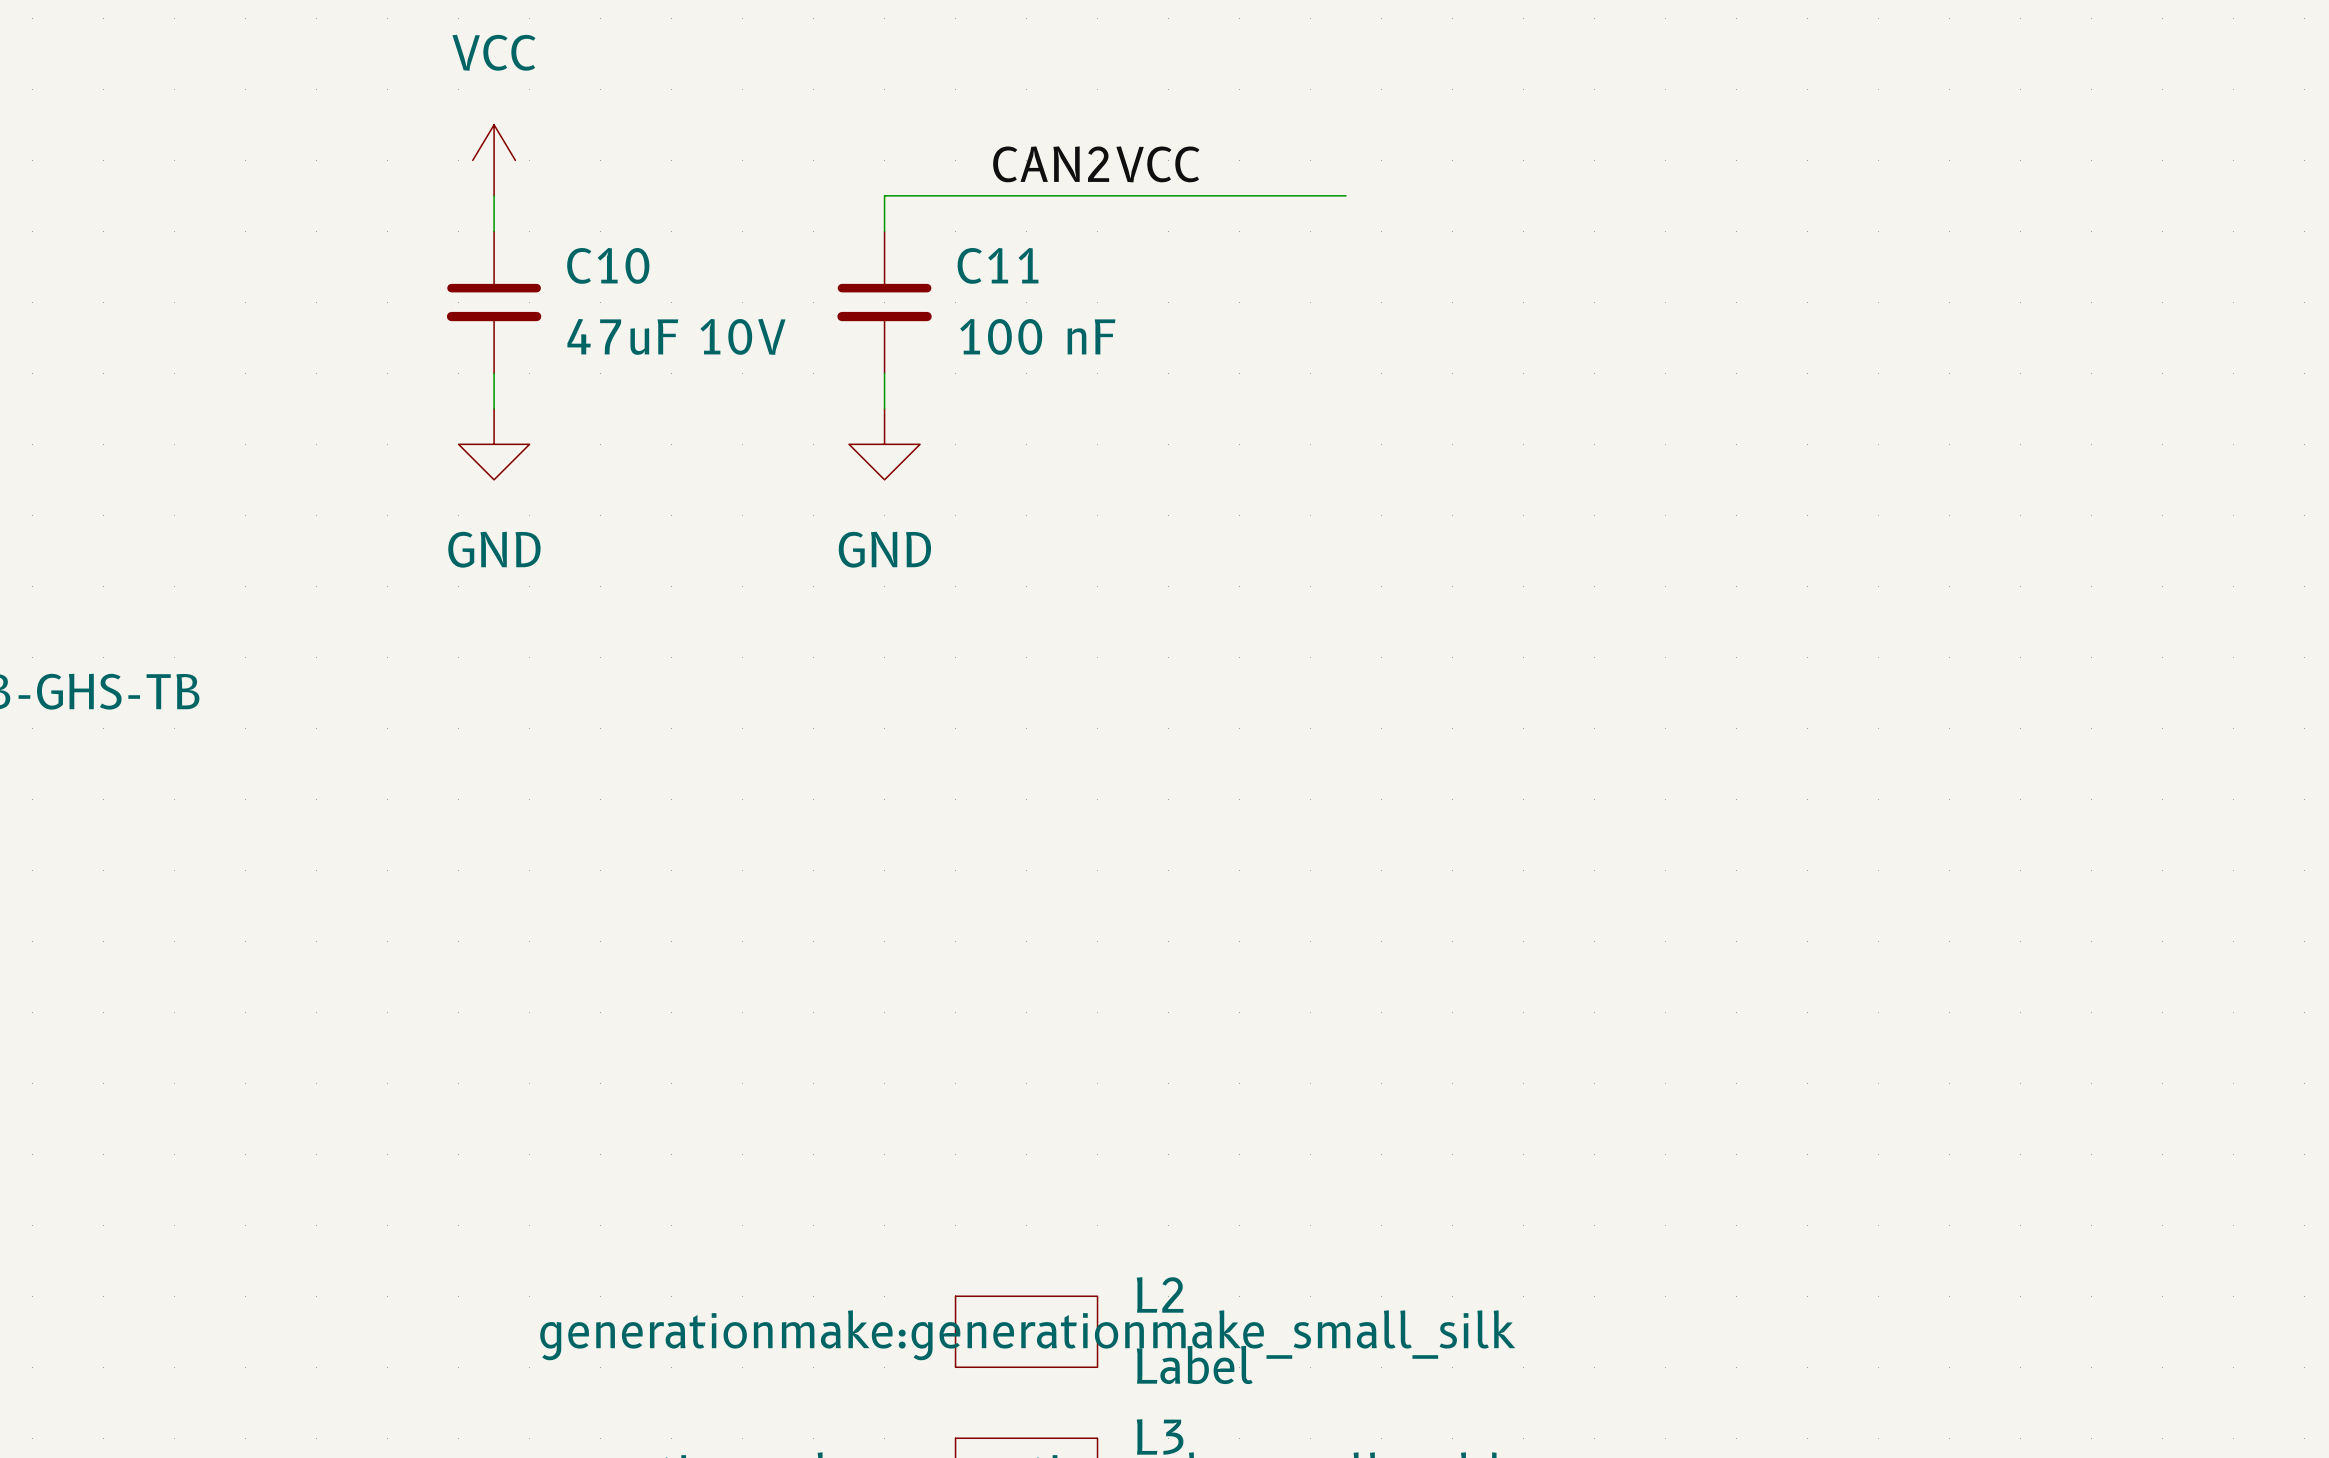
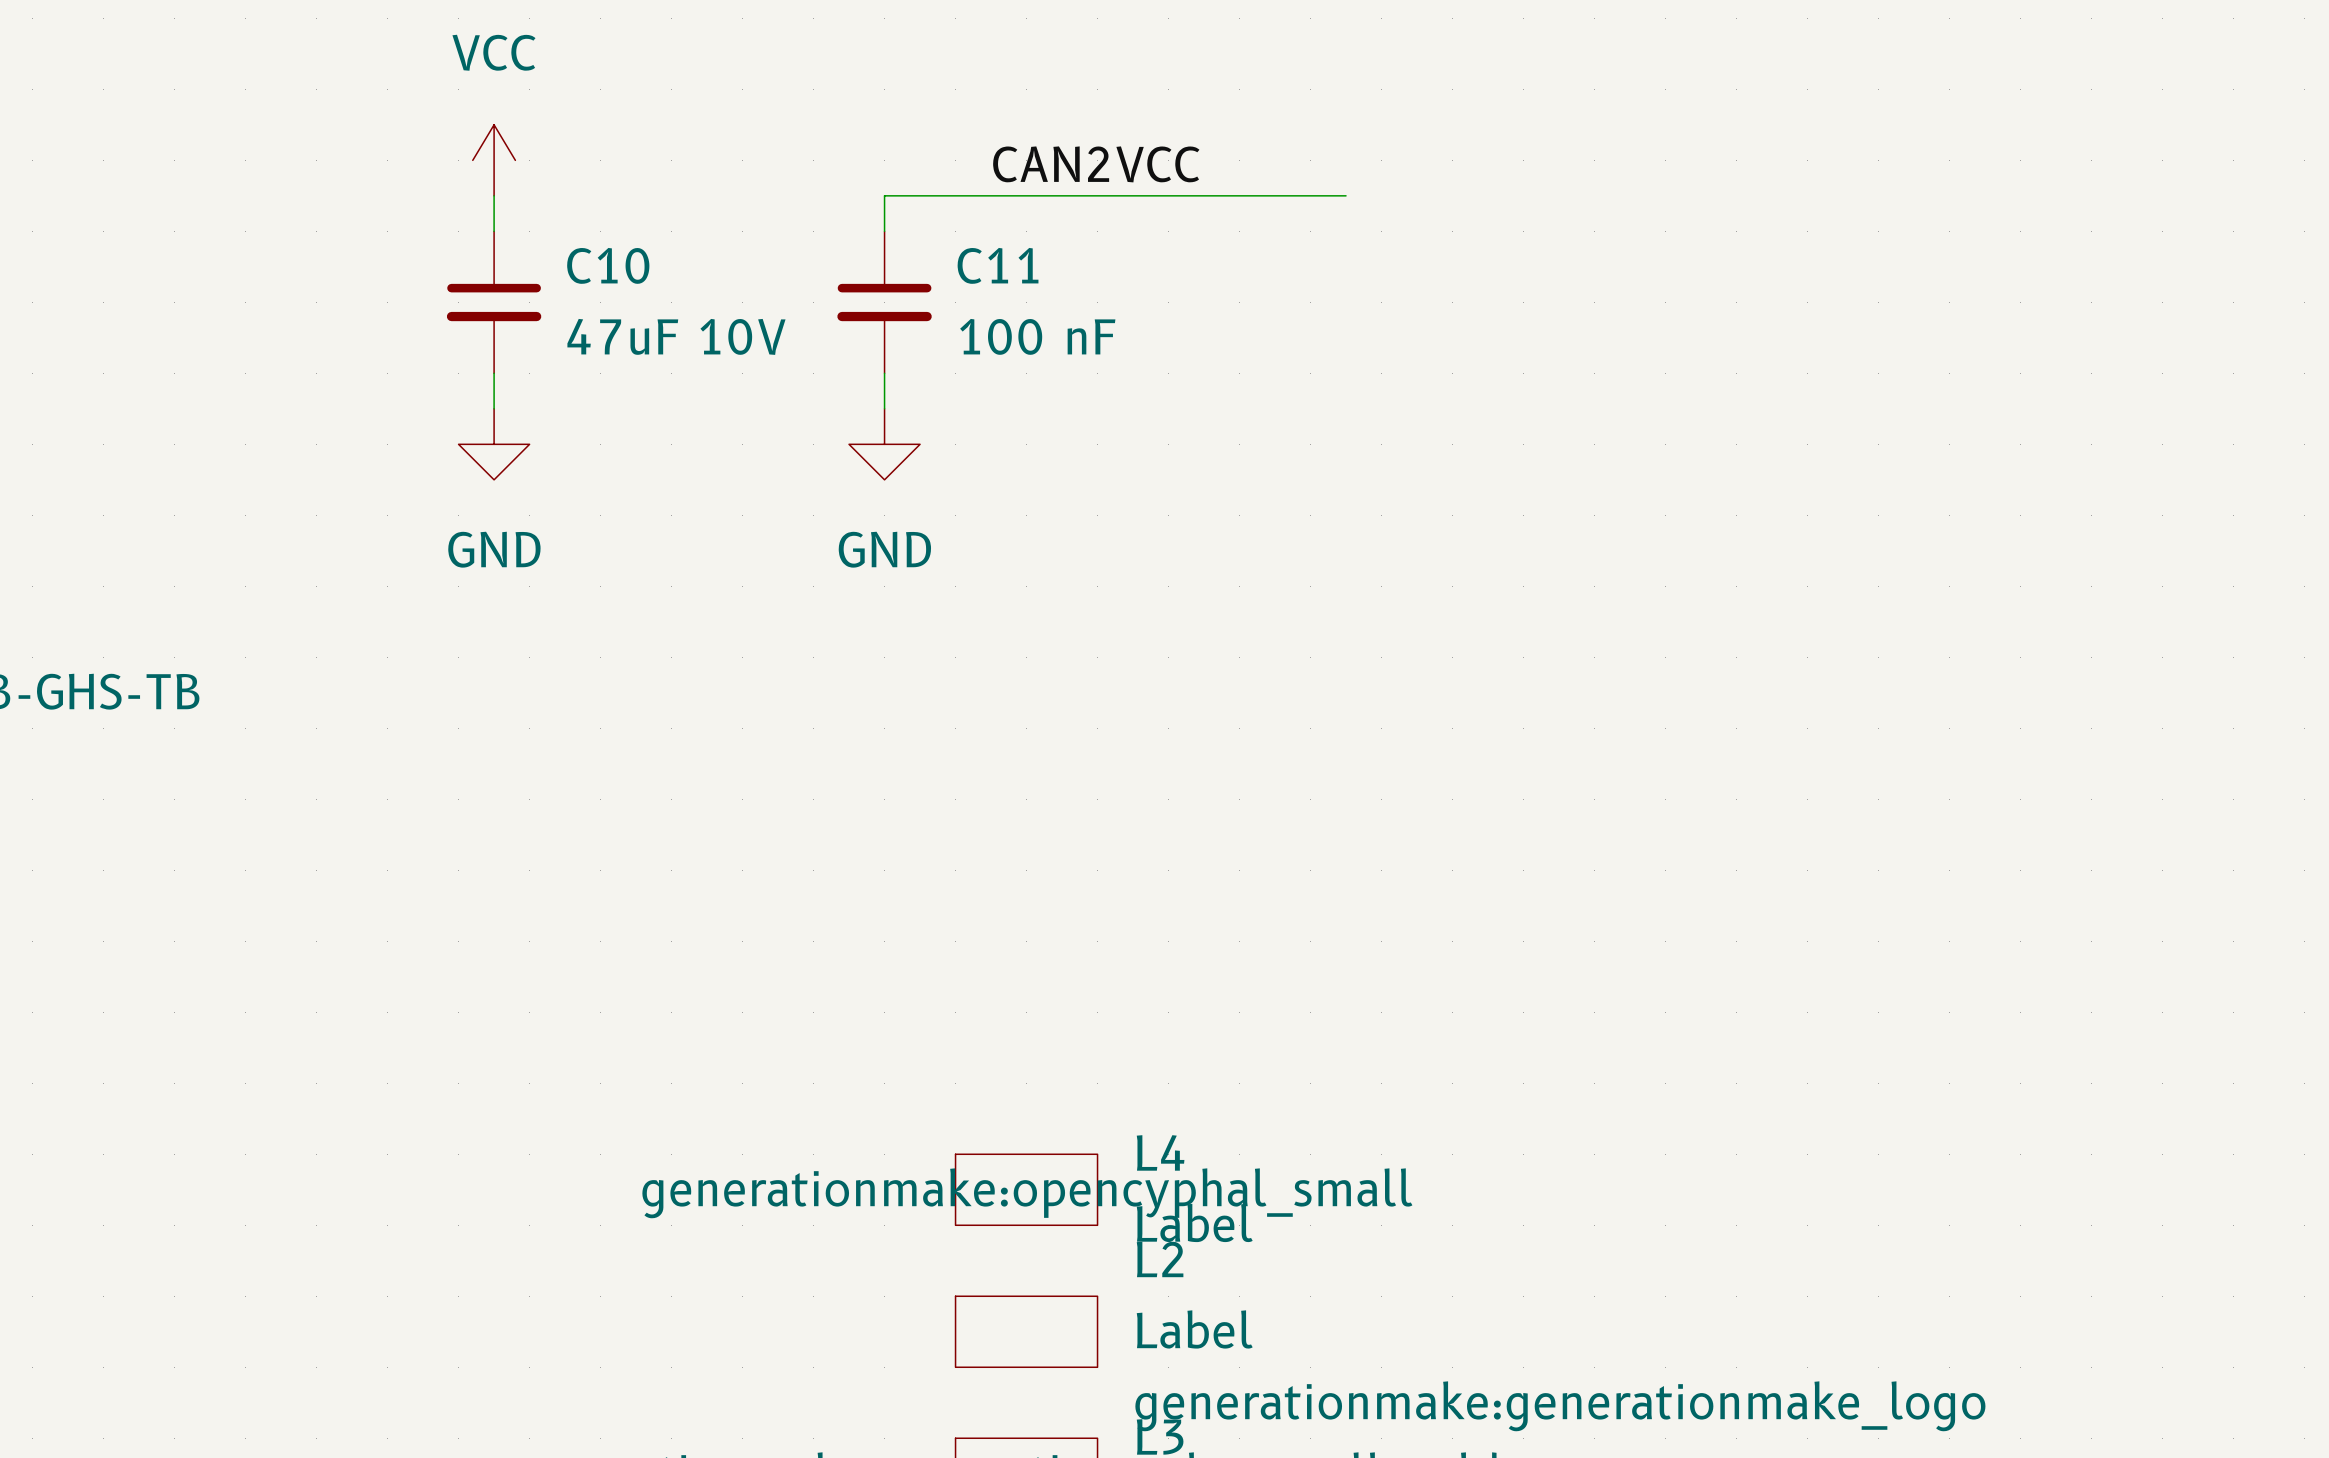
L4: none -> Label (1026, 1189)
L2 name position: L2 (1160, 1294) -> L2 (1160, 1259)
L2 text: generationmake:generationmake_small_silk (1027, 1335) -> generationmake:generationmake_logo (1560, 1406)
L2 value position: Label (1194, 1364) -> Label (1194, 1329)

